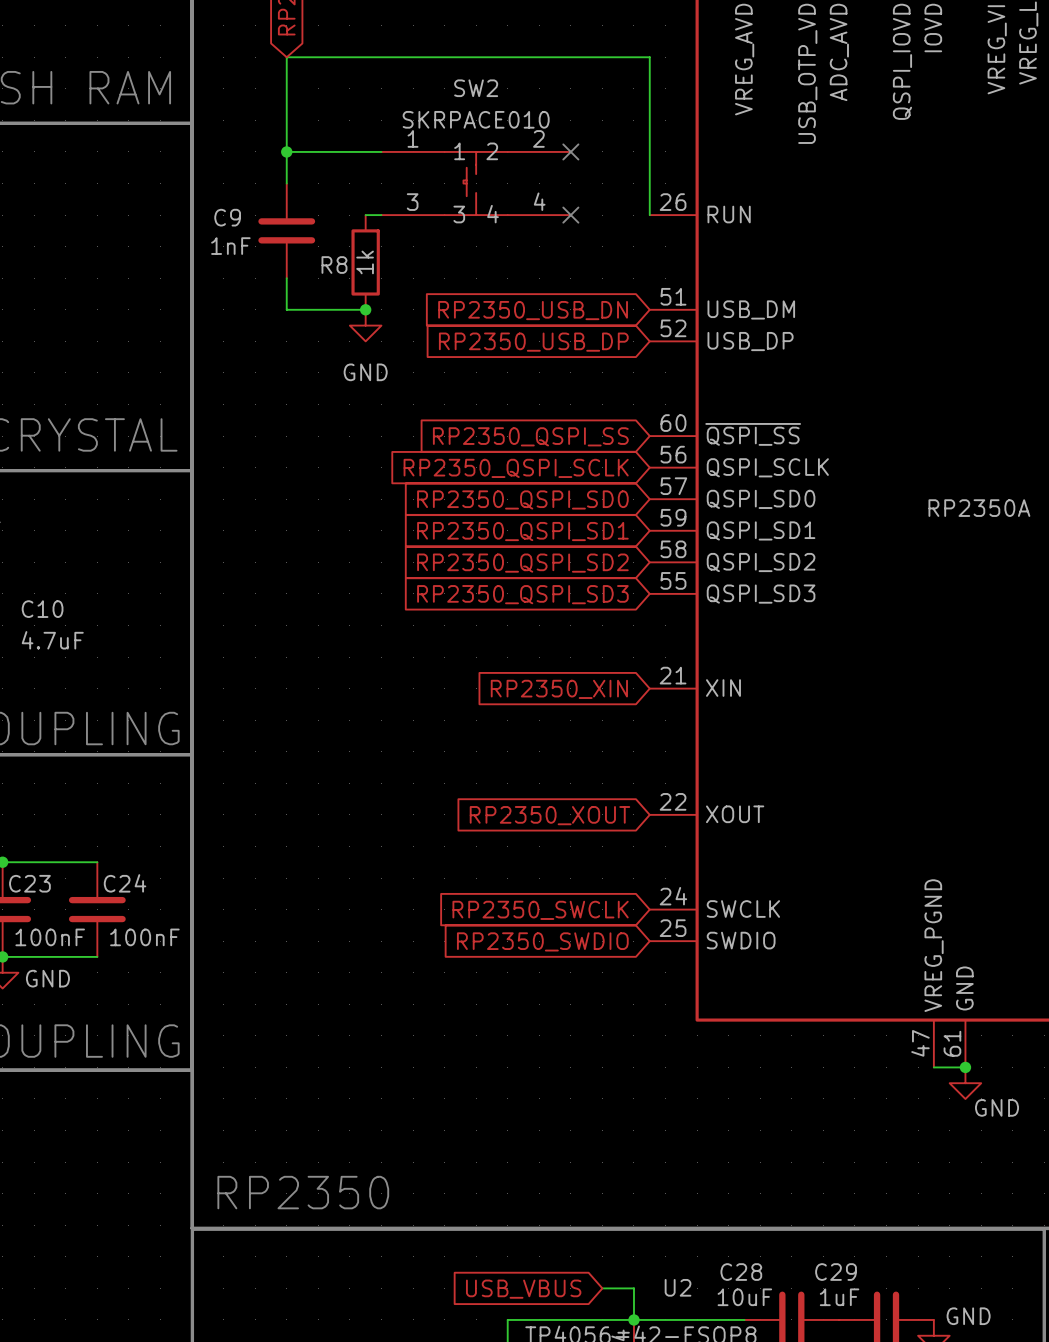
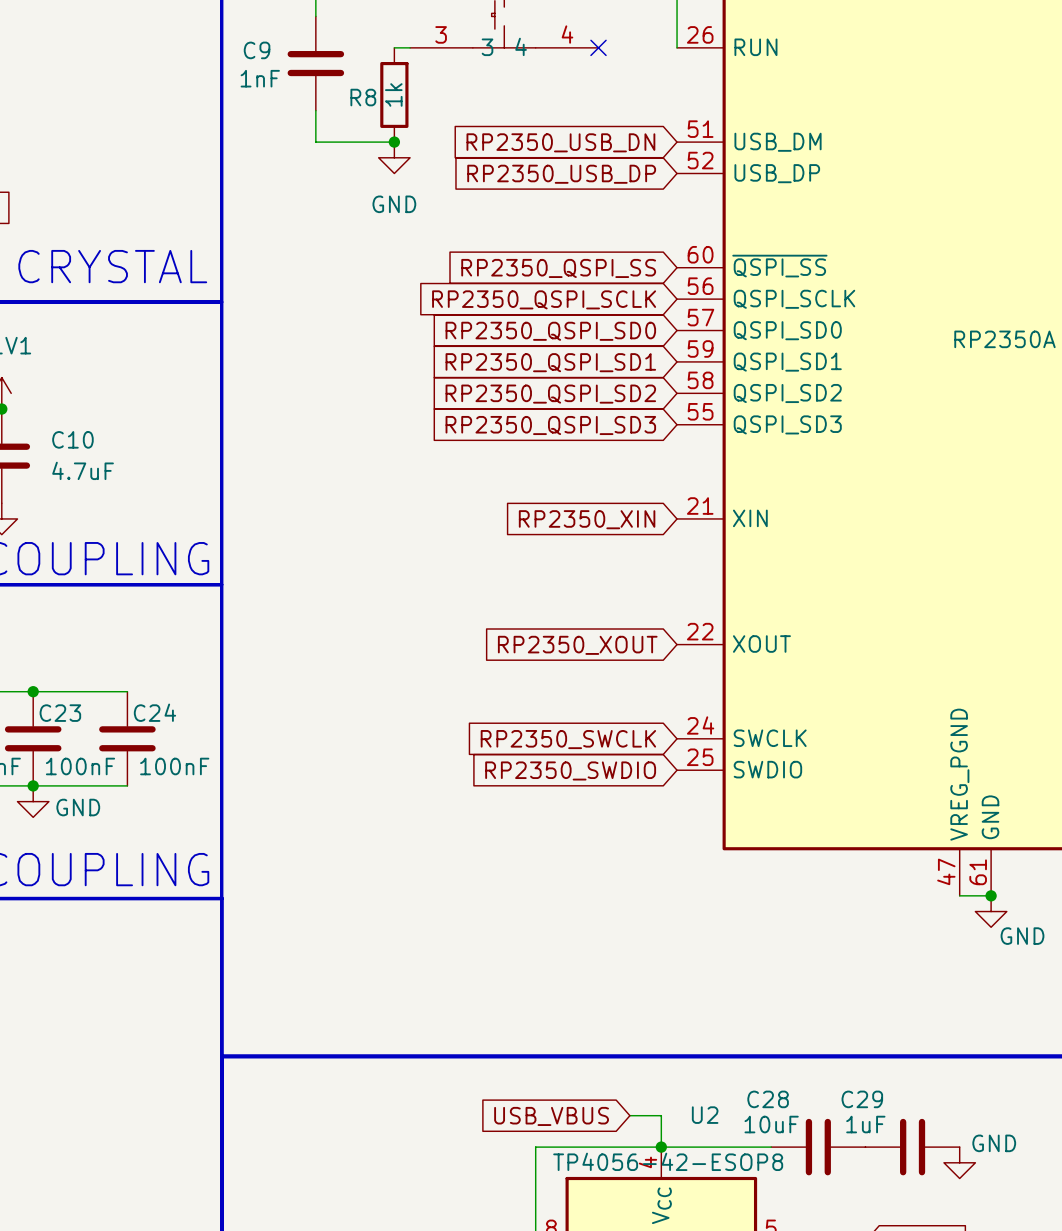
text: RP2350 (303, 1192) -> none

